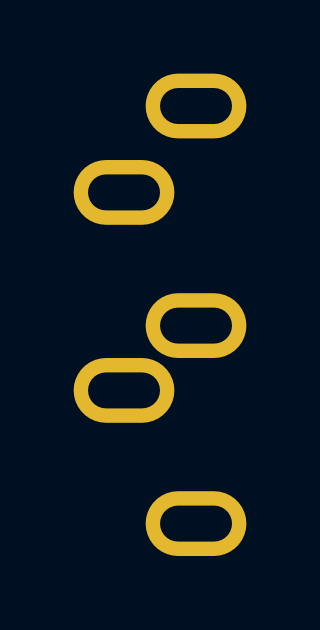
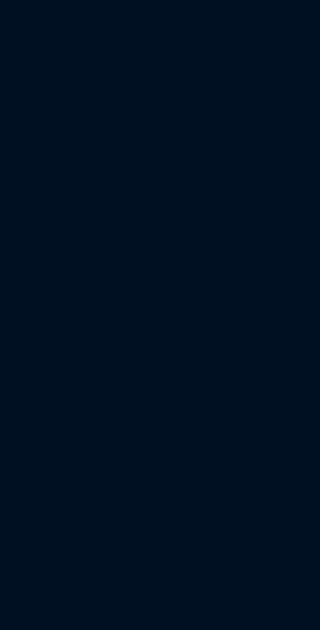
part: (160, 314) -> none

